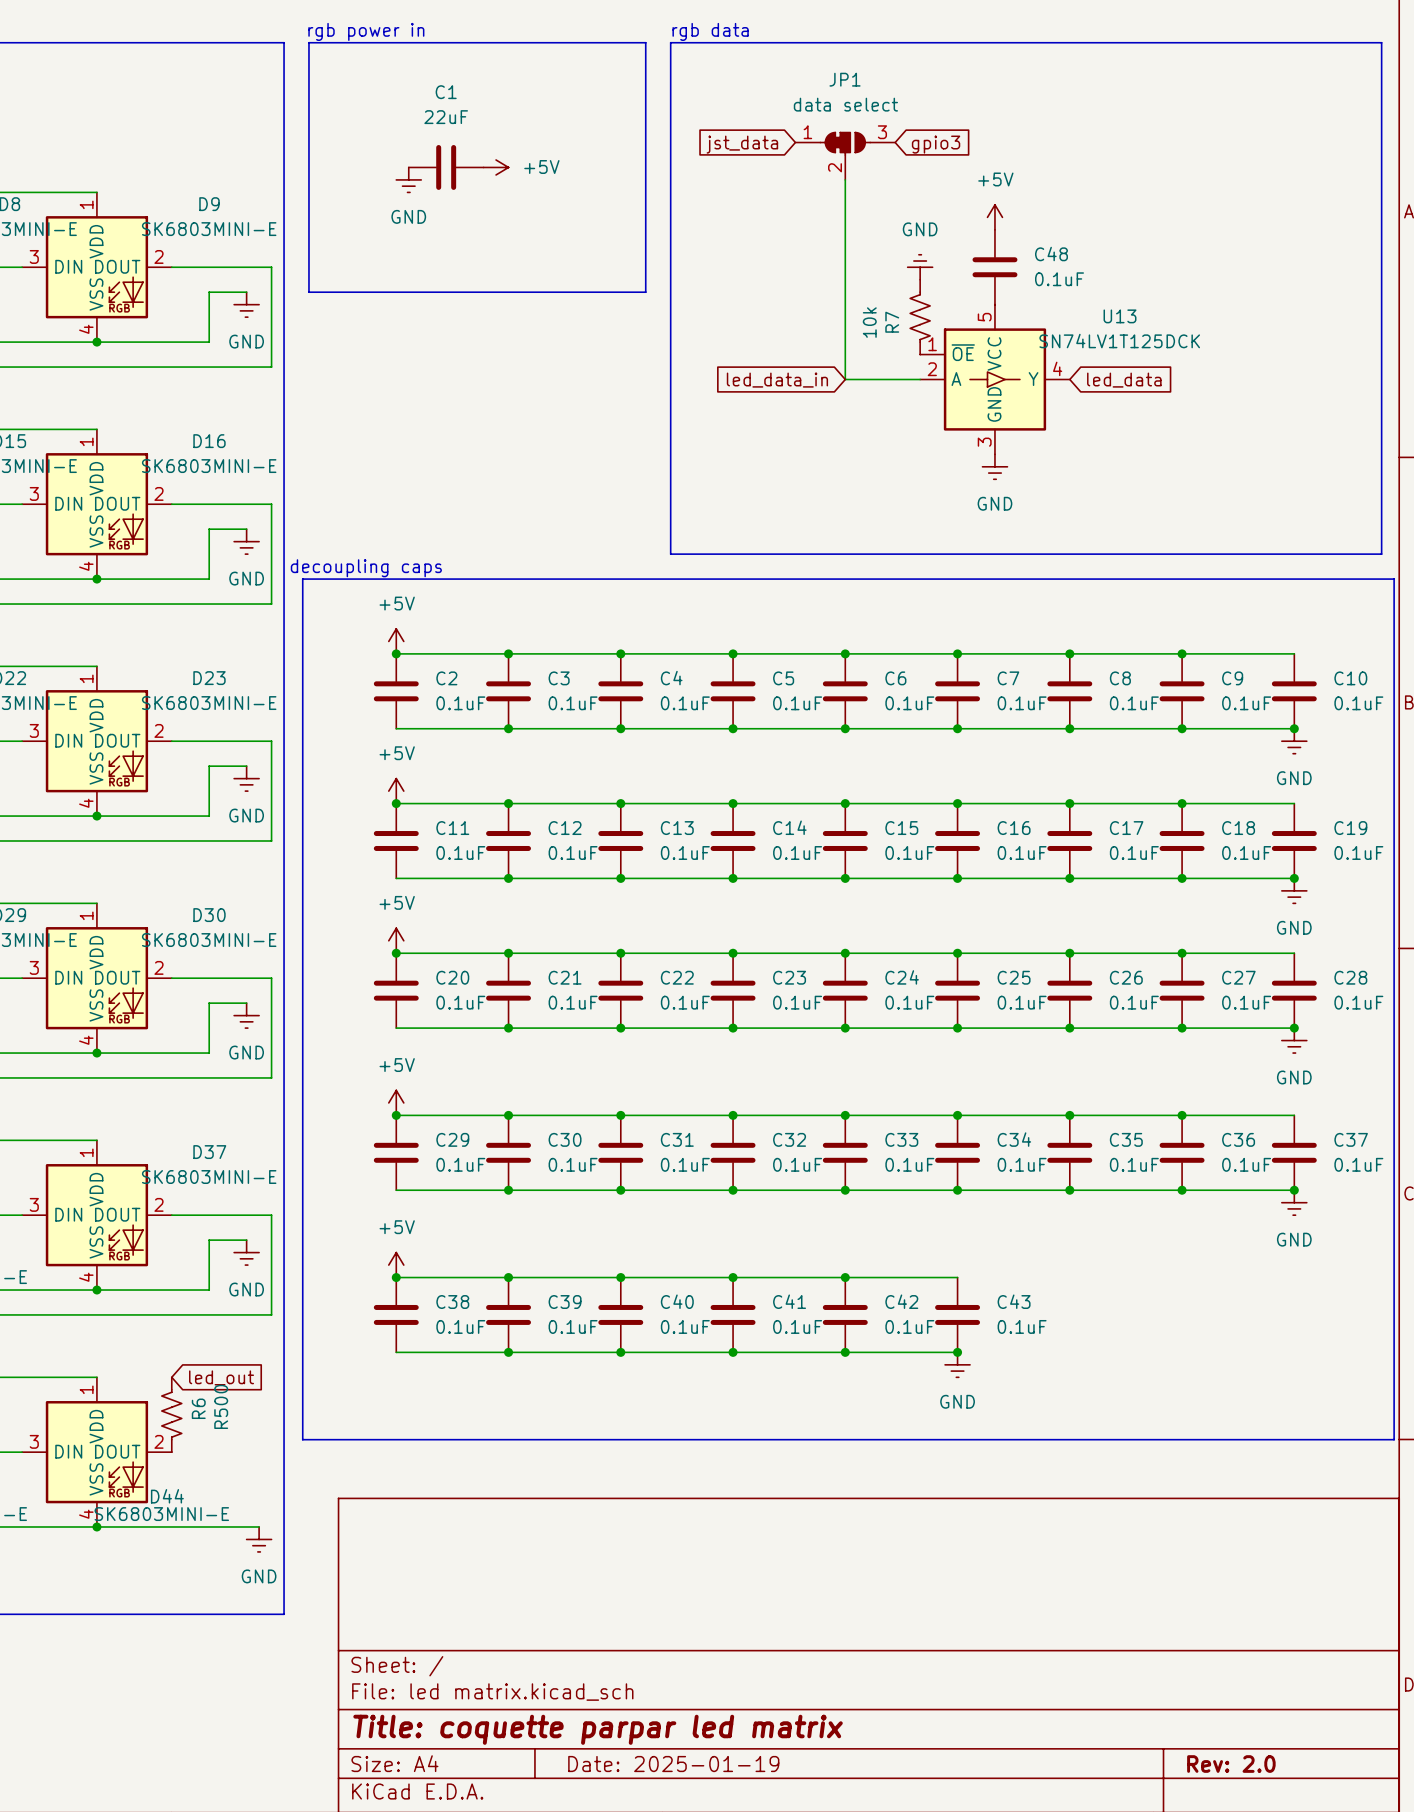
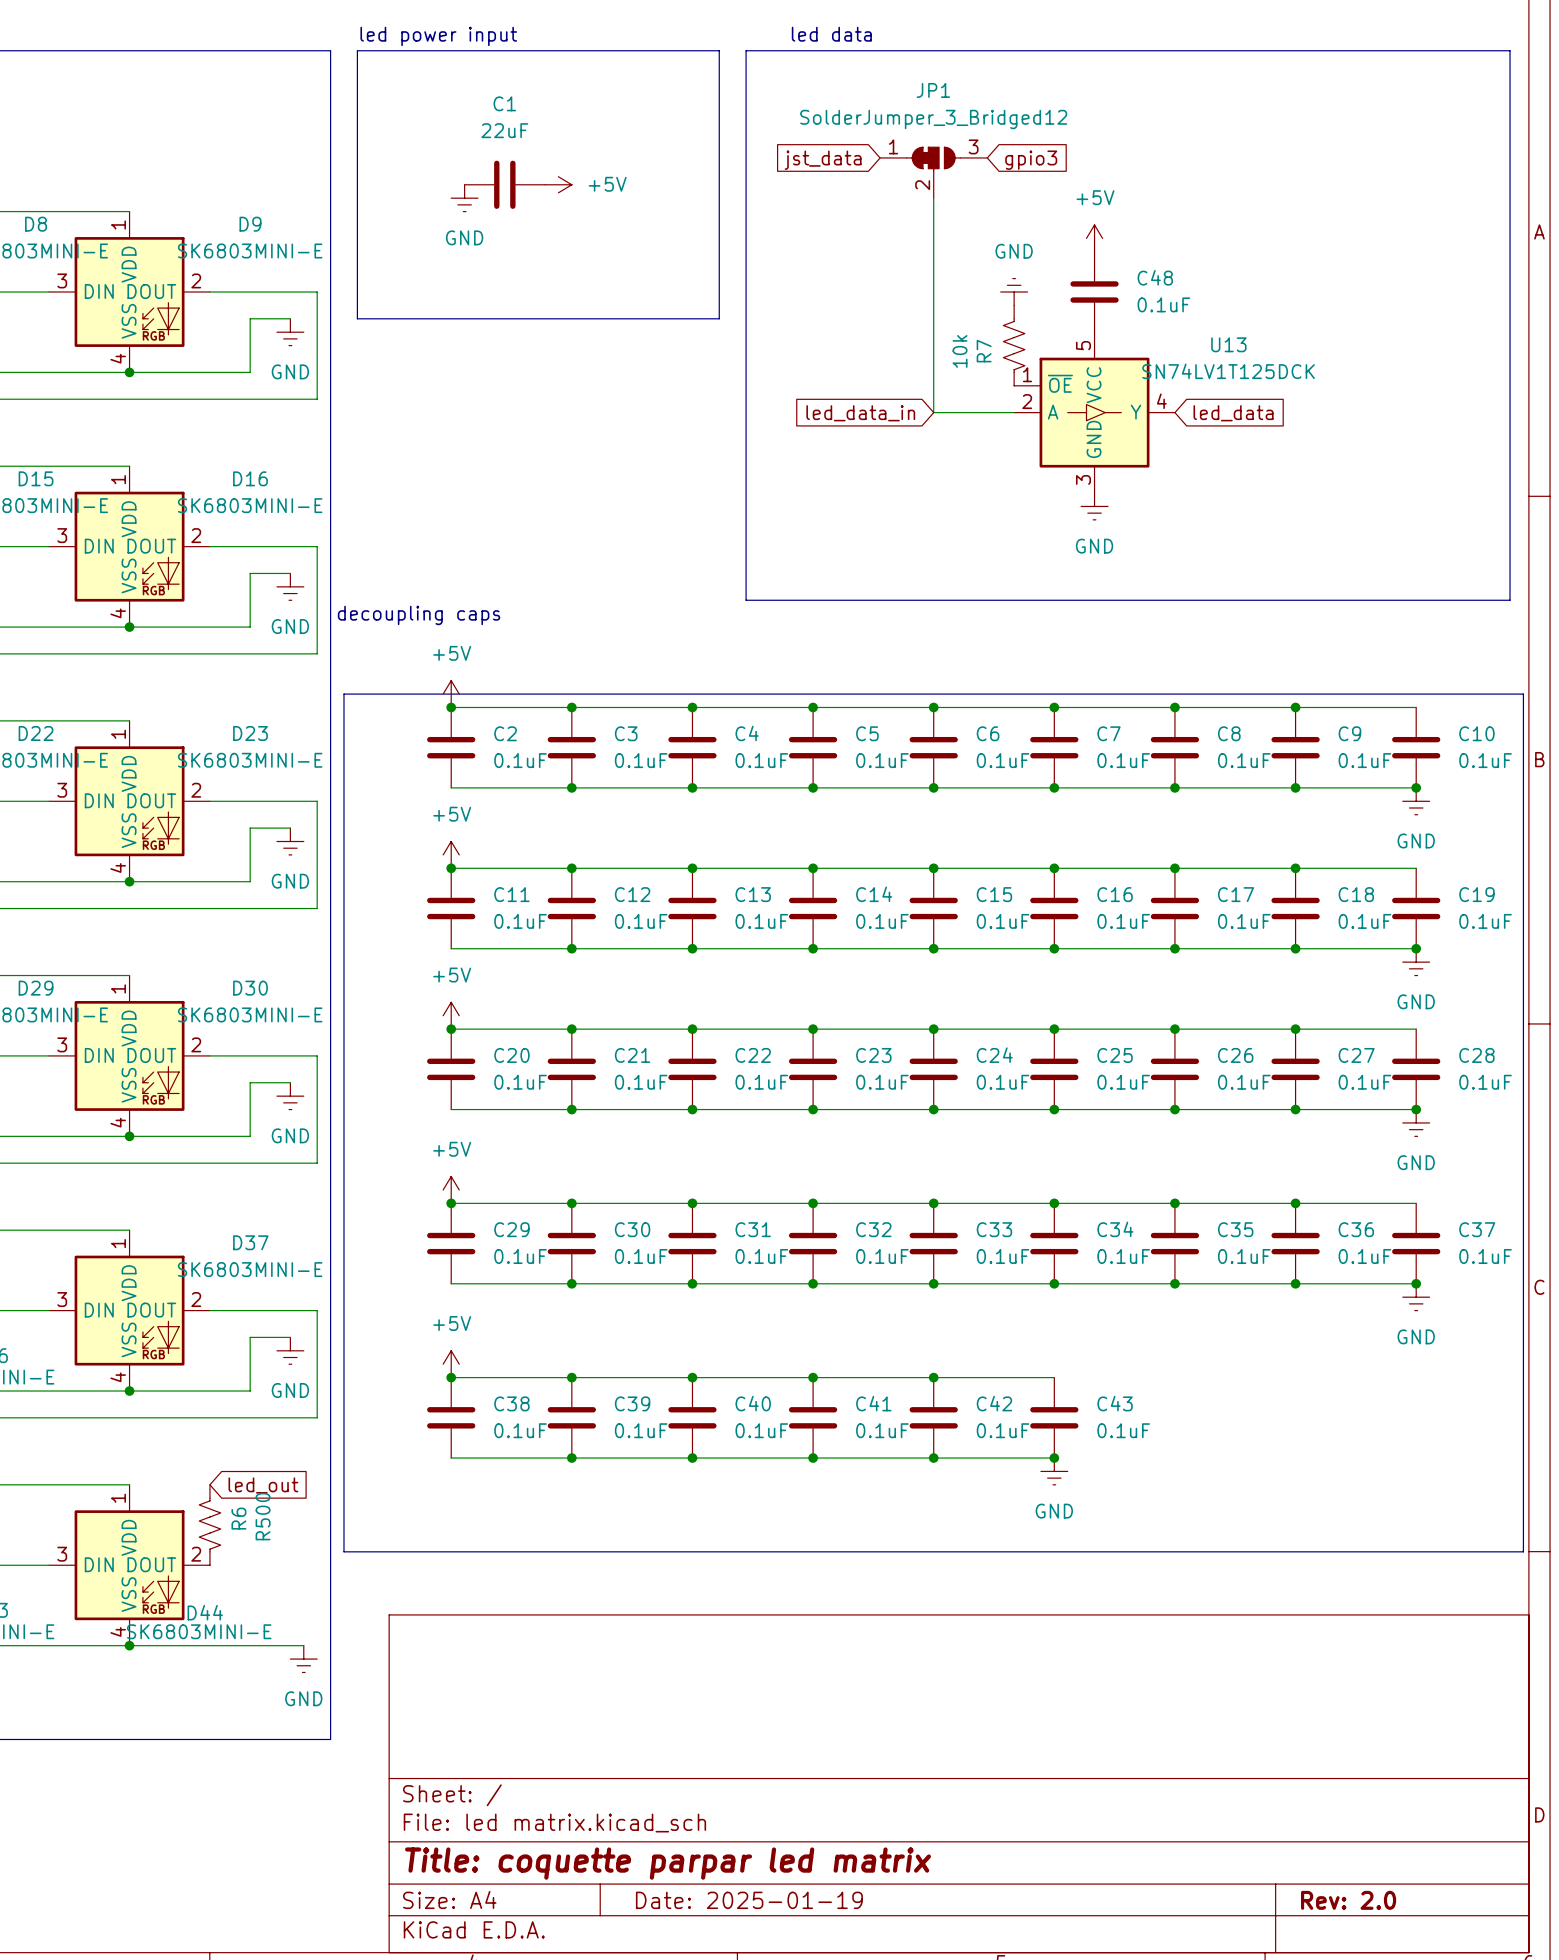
text: rgb power in (366, 31) -> led power input (438, 36)
text: rgb data (710, 31) -> led data (831, 34)
JP1 value: data select (845, 104) -> SolderJumper_3_Bridged12 (933, 119)
line: (1394, 641) (1394, 579) (302, 579) (302, 1439) -> (1523, 694) (343, 694) (343, 1551) (350, 1551)

